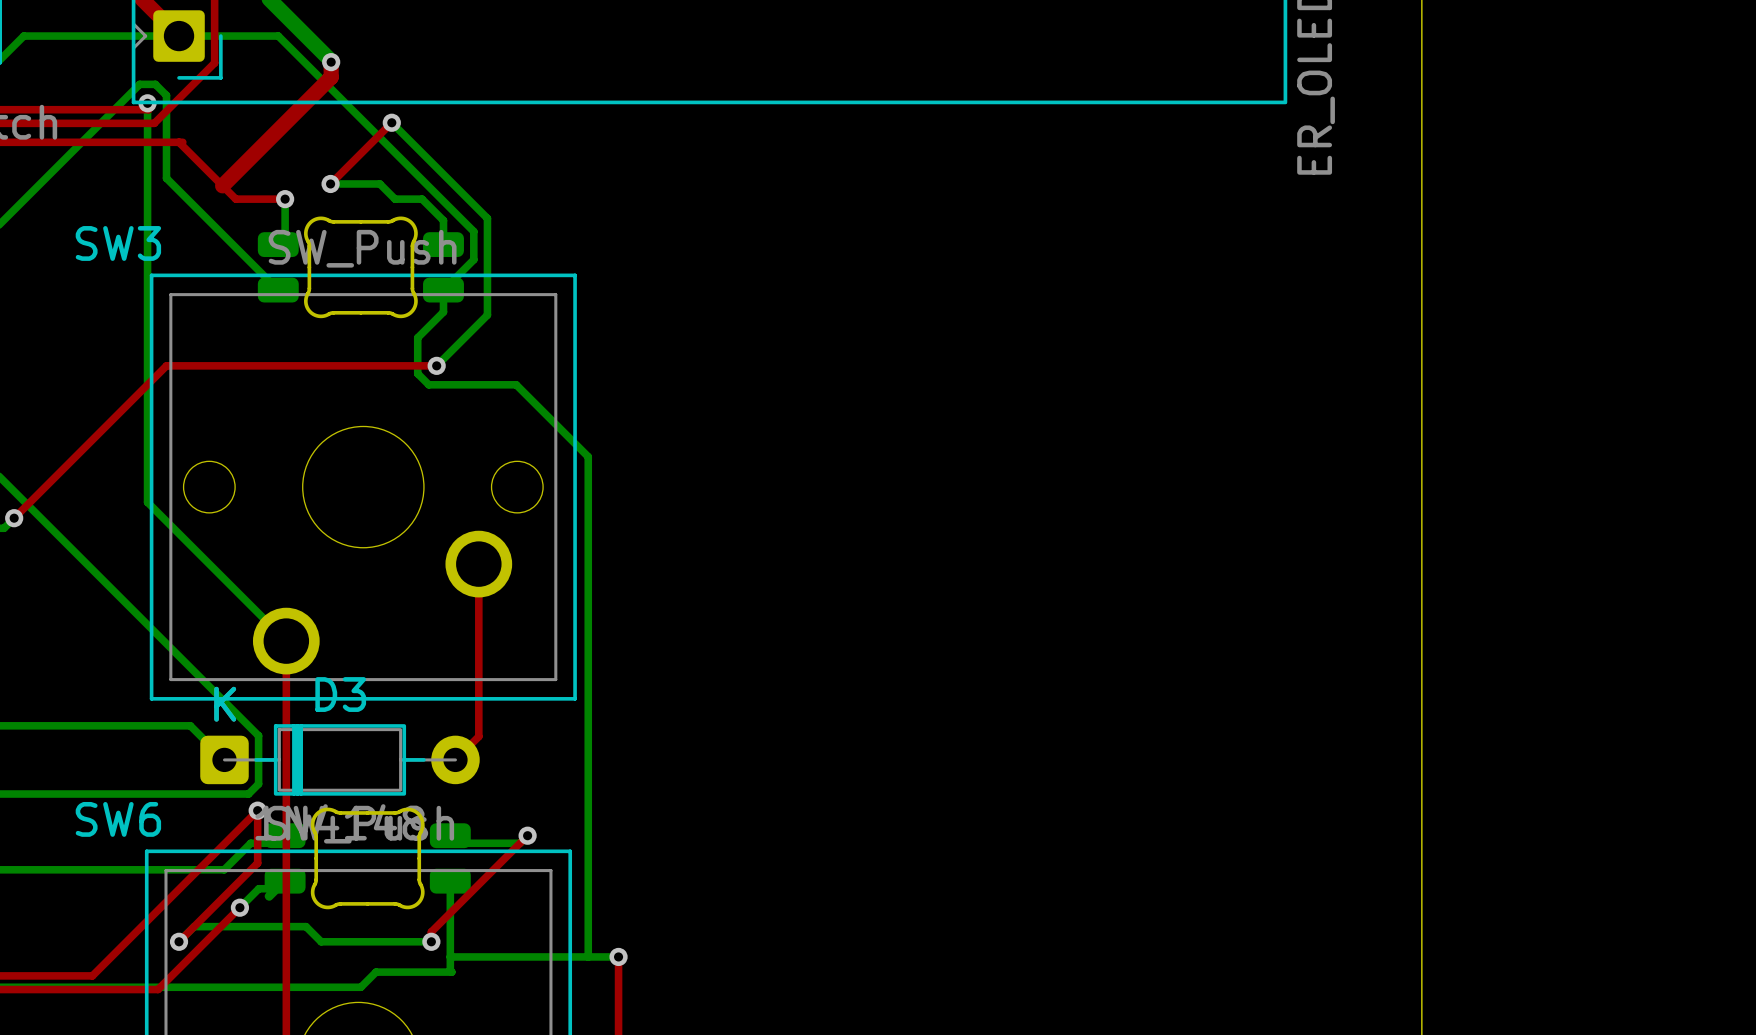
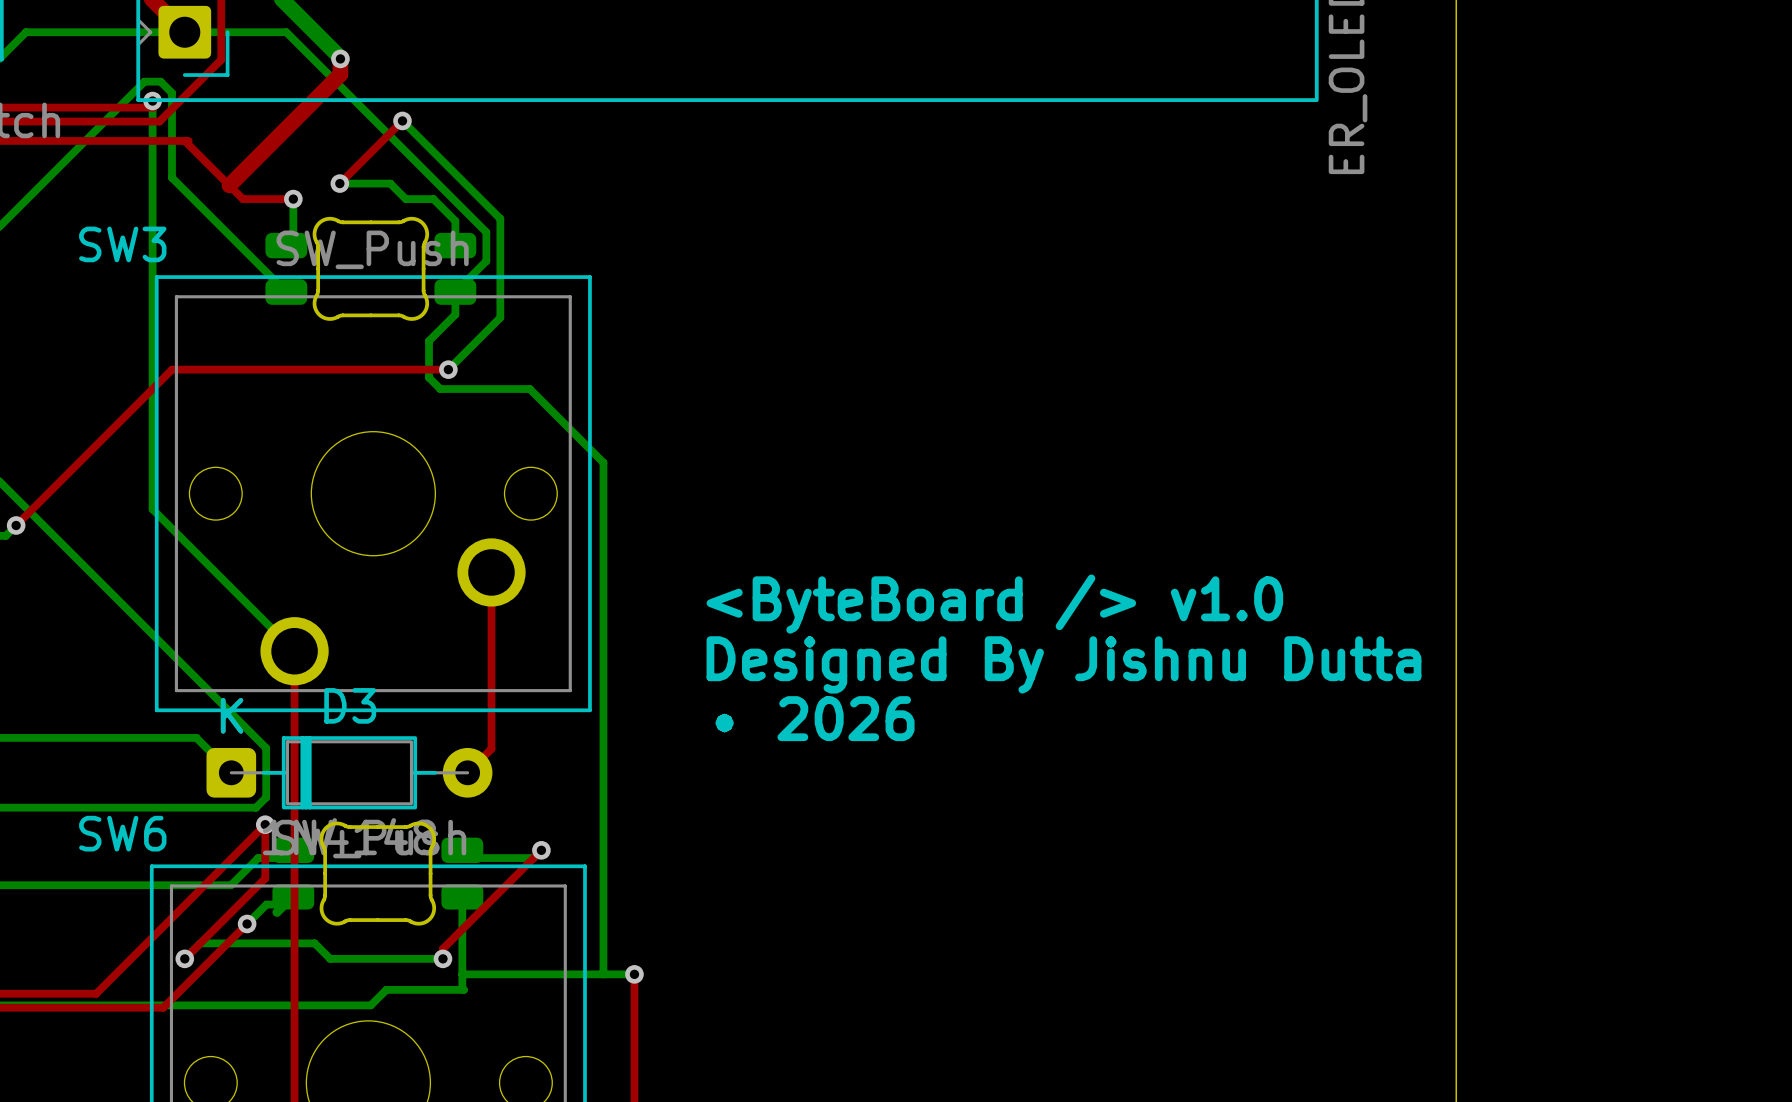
text: none -> <ByteBoard /> v1.0 (994, 604)
text: none -> Designed By Jishnu Dutta (1063, 664)
text: none -> • 2026 (815, 718)

